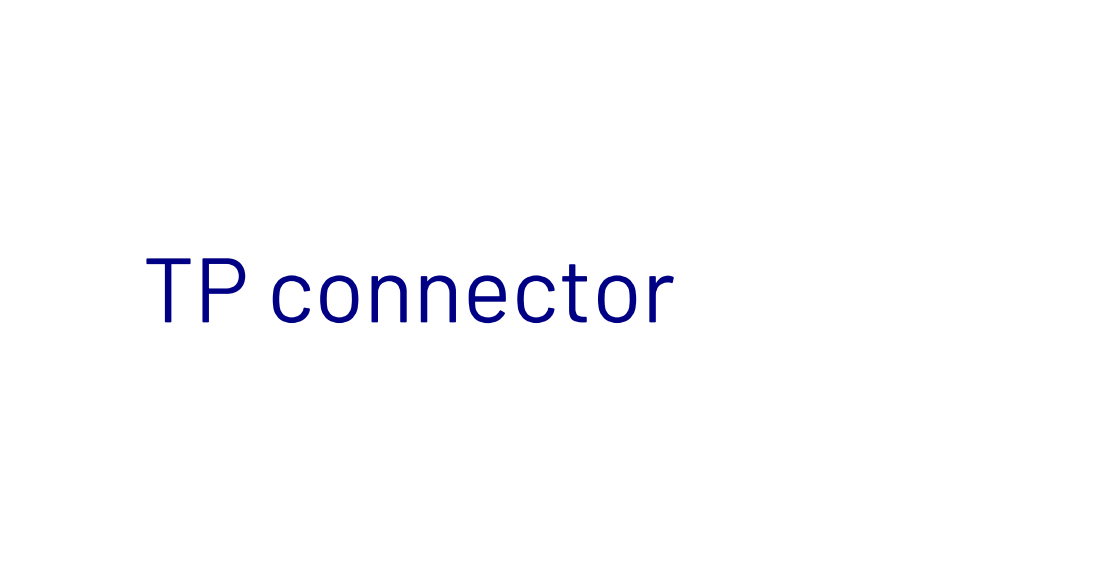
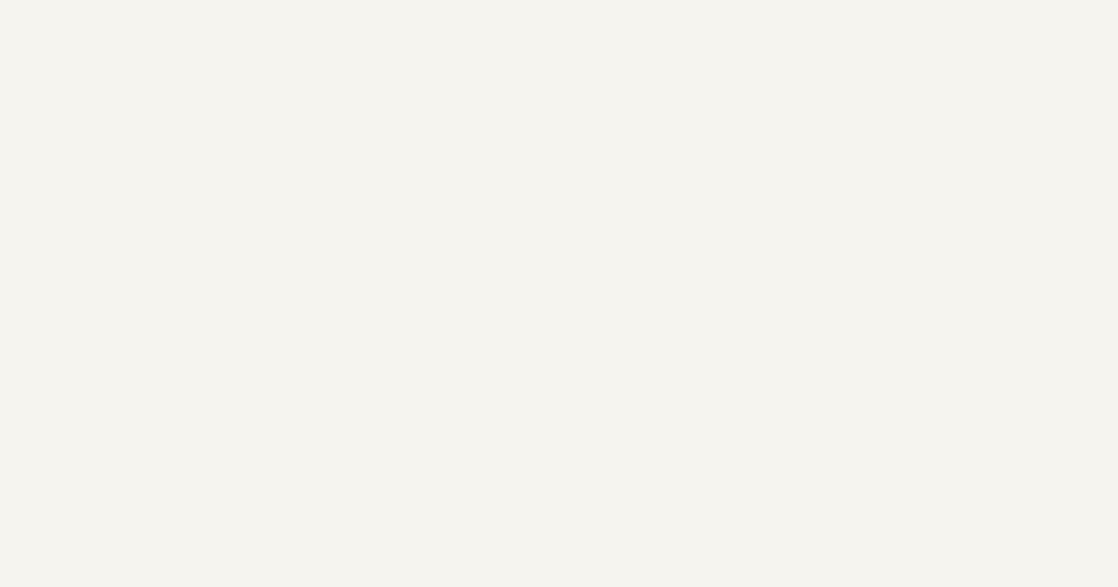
text: TP connector (410, 290) -> none

